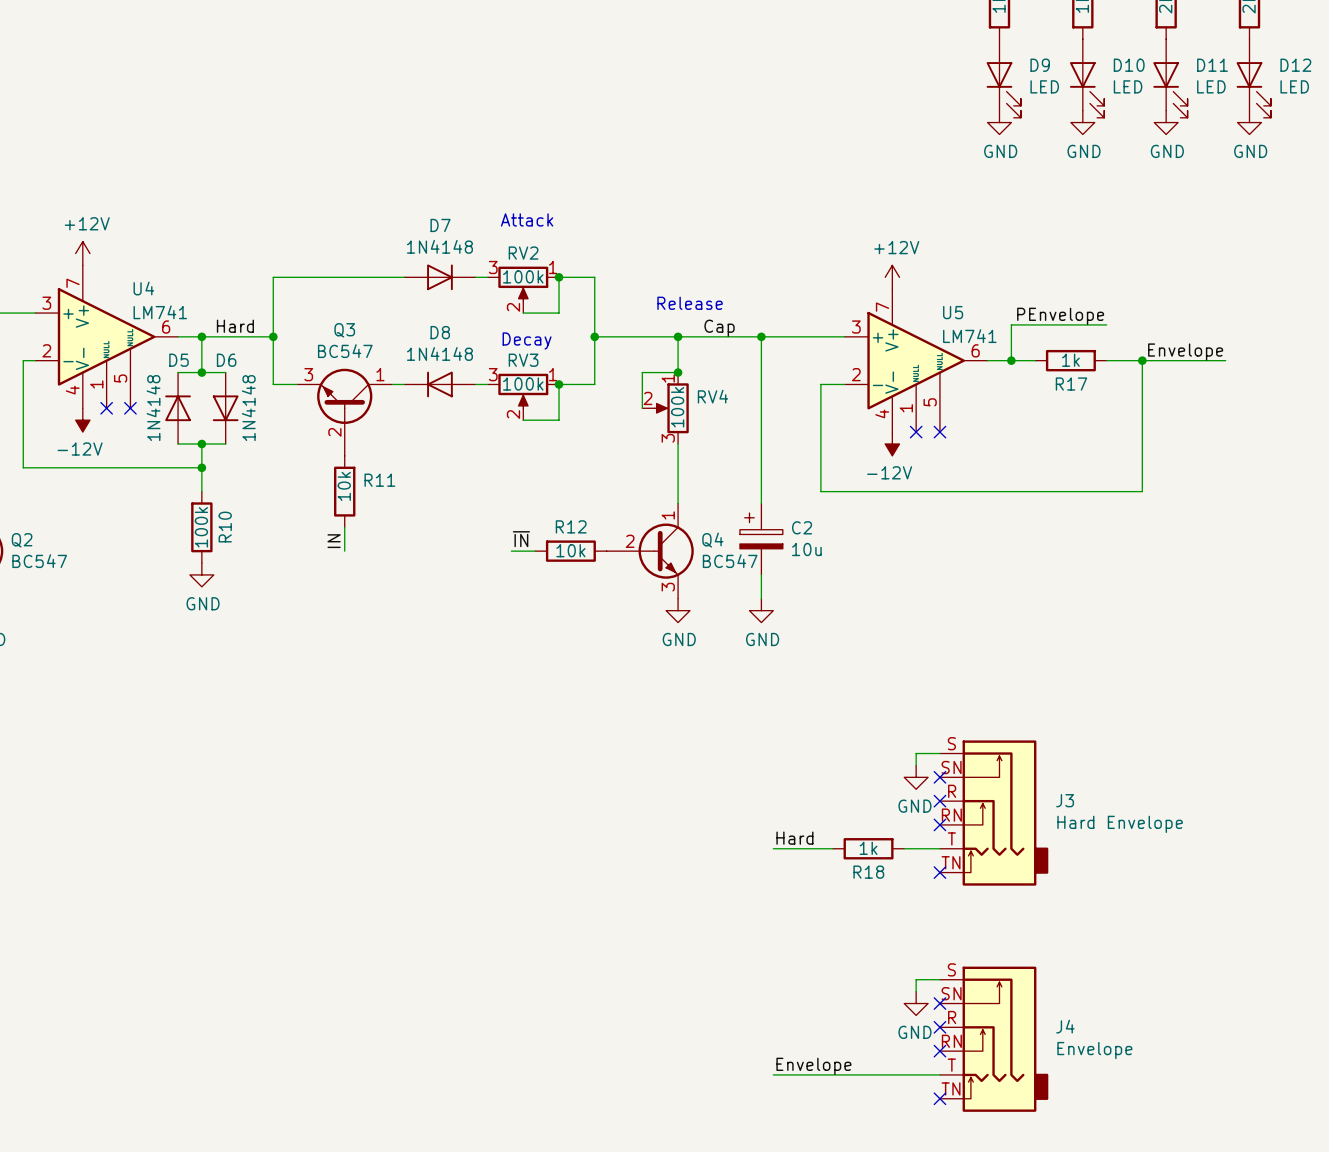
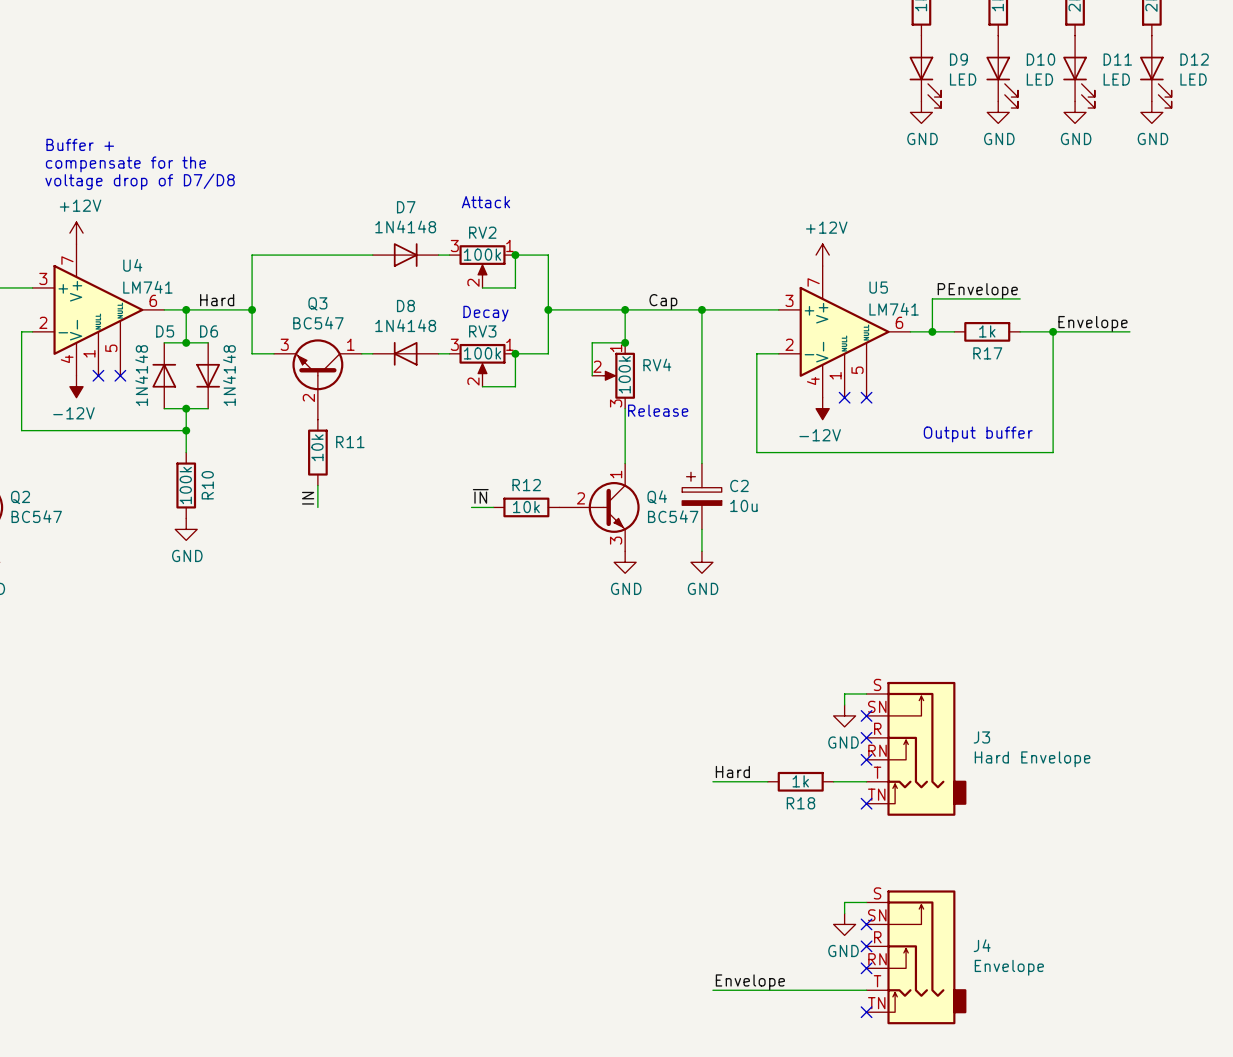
text: none -> Buffer + (80, 144)
text: none -> compensate for the (125, 164)
text: none -> voltage drop of D7/D8 (140, 181)
text position: Release (690, 303) -> Release (658, 410)
text: none -> Output buffer (978, 434)

